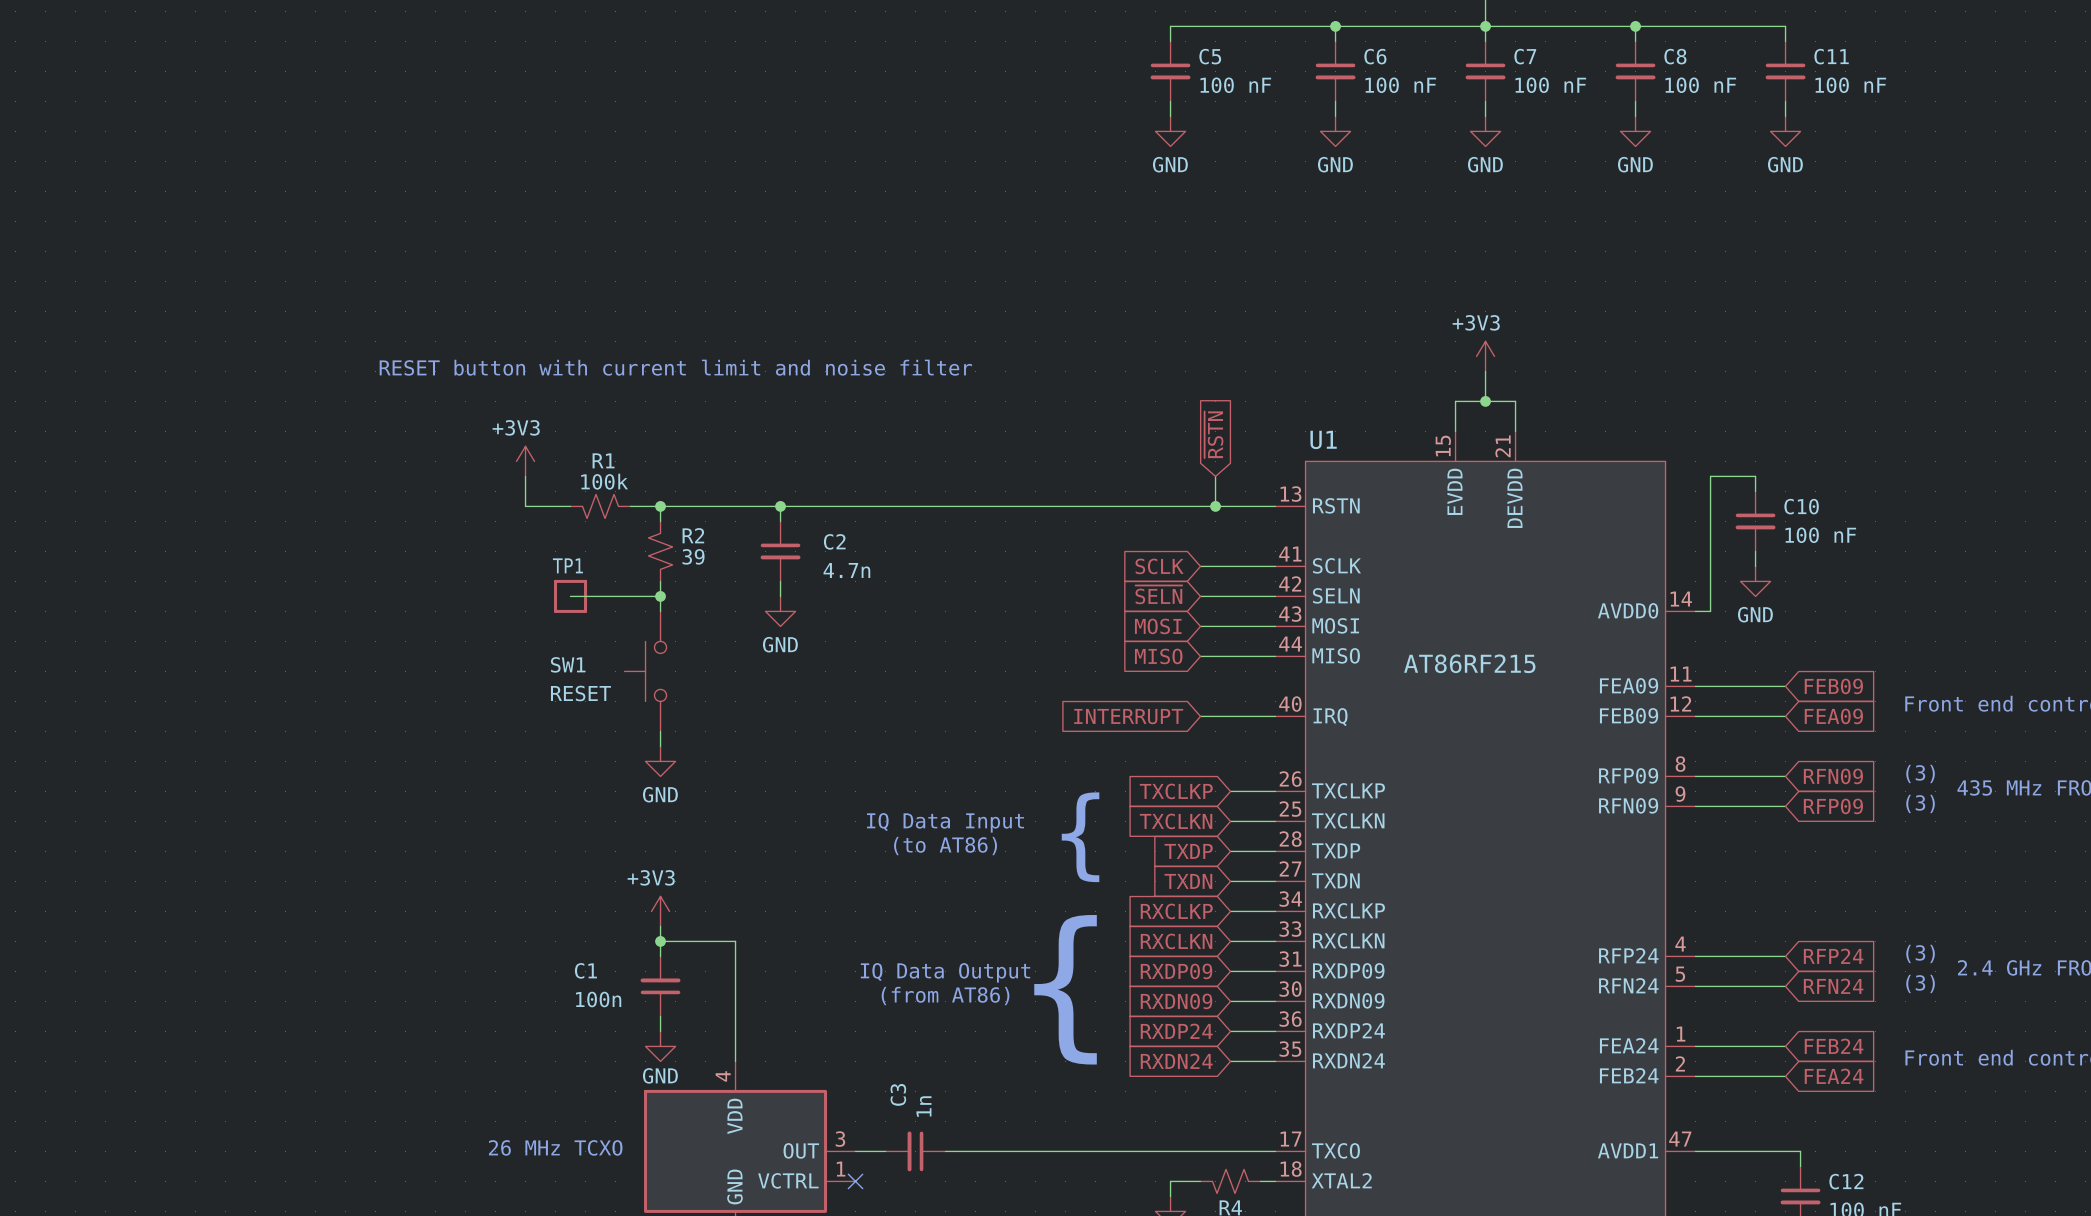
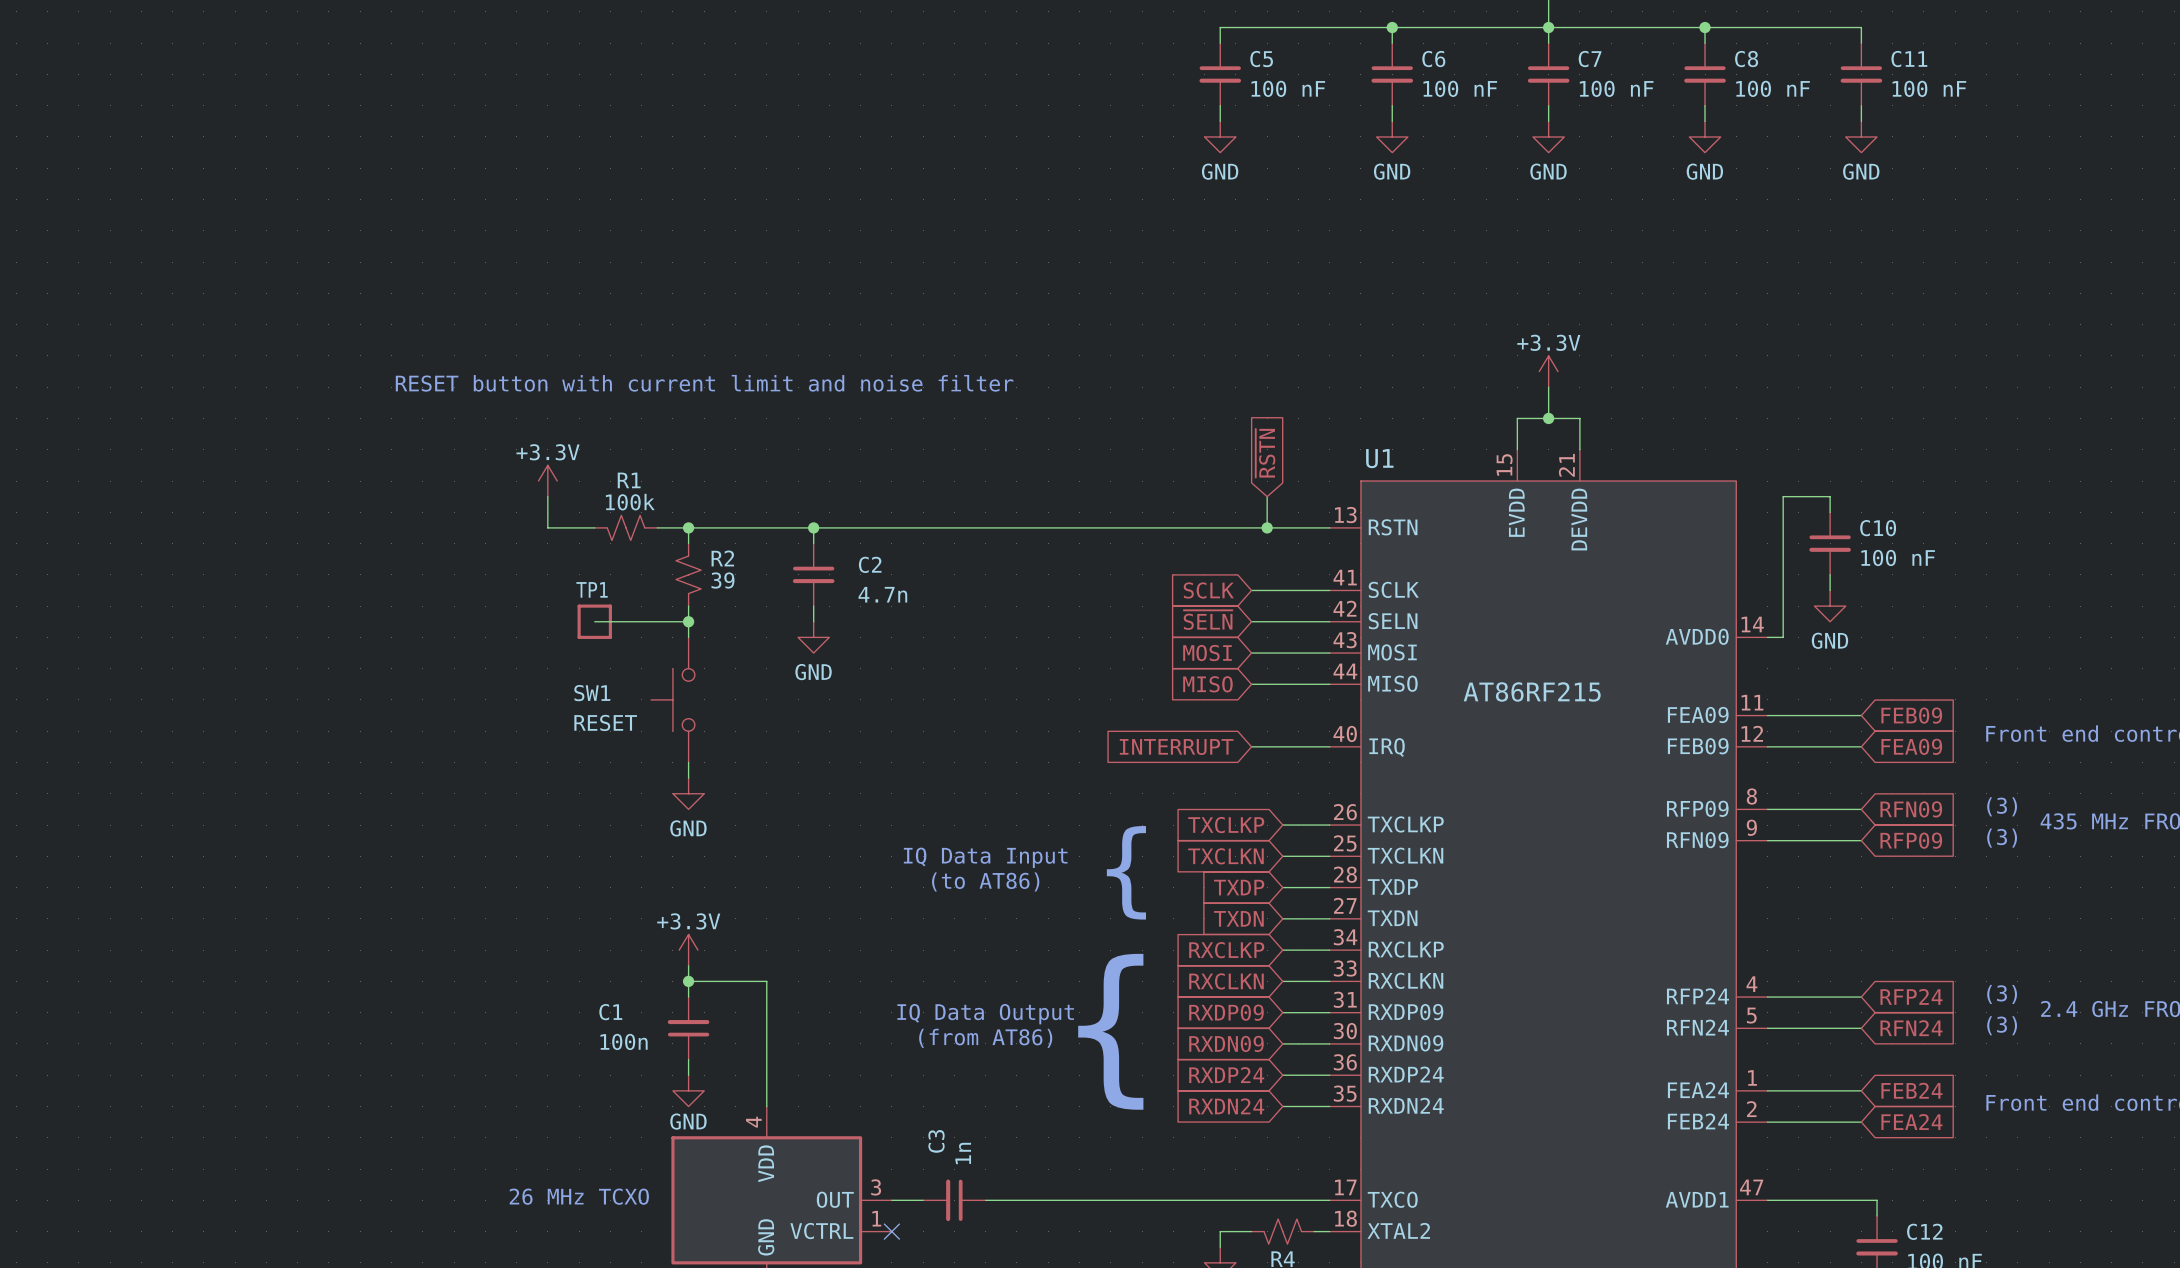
power symbol: +3V3 (1485, 356) -> +3.3V (1548, 371)
power symbol: +3V3 (525, 461) -> +3.3V (547, 481)
power symbol: +3V3 (660, 911) -> +3.3V (688, 950)

